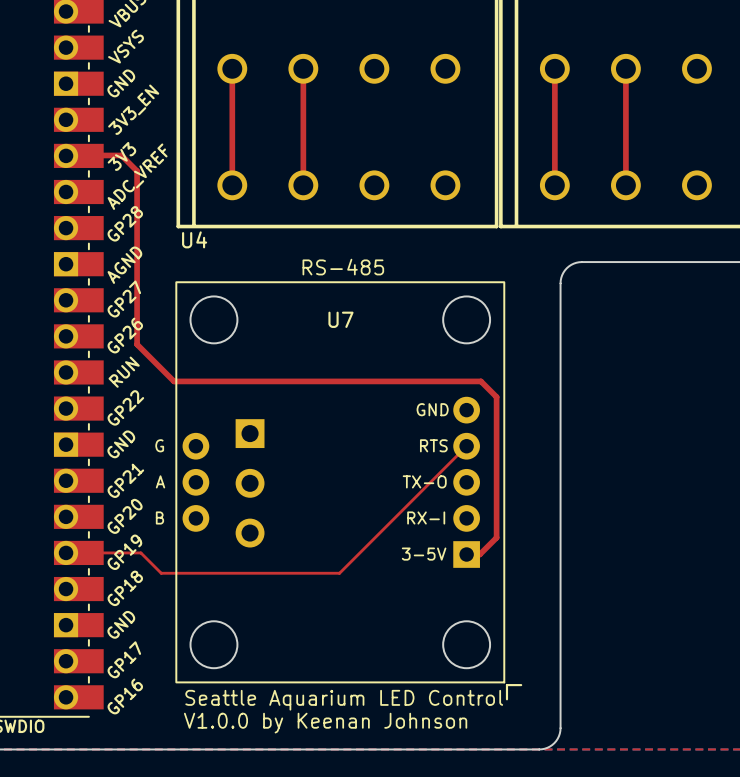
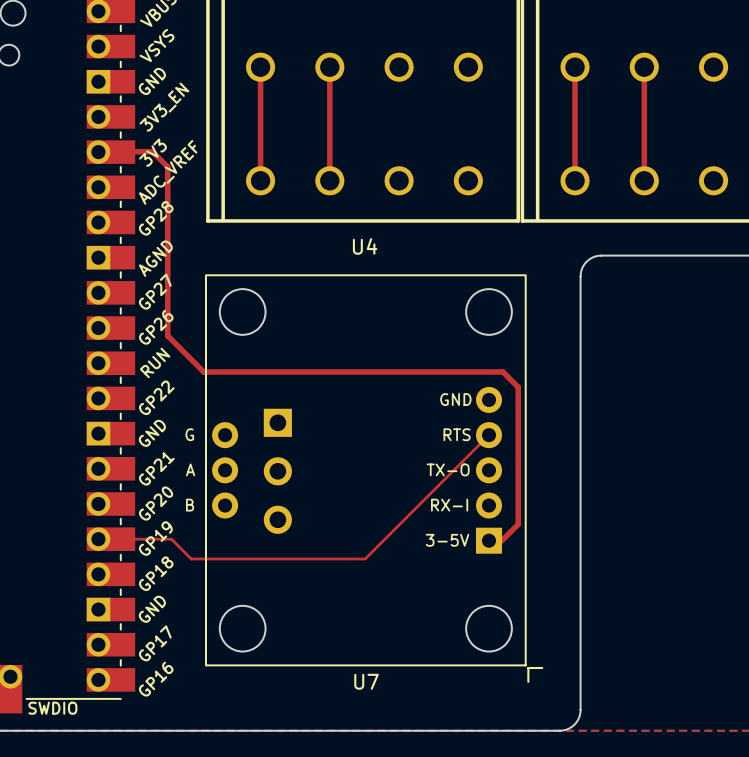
U4 name position: U4 (194, 239) -> U4 (365, 246)
text: RS-485 (343, 267) -> none
U7 name position: U7 (340, 319) -> U7 (366, 681)
text: Seattle Aquarium LED Control (344, 700) -> none
text: V1.0.0 by Keenan Johnson (325, 723) -> none

